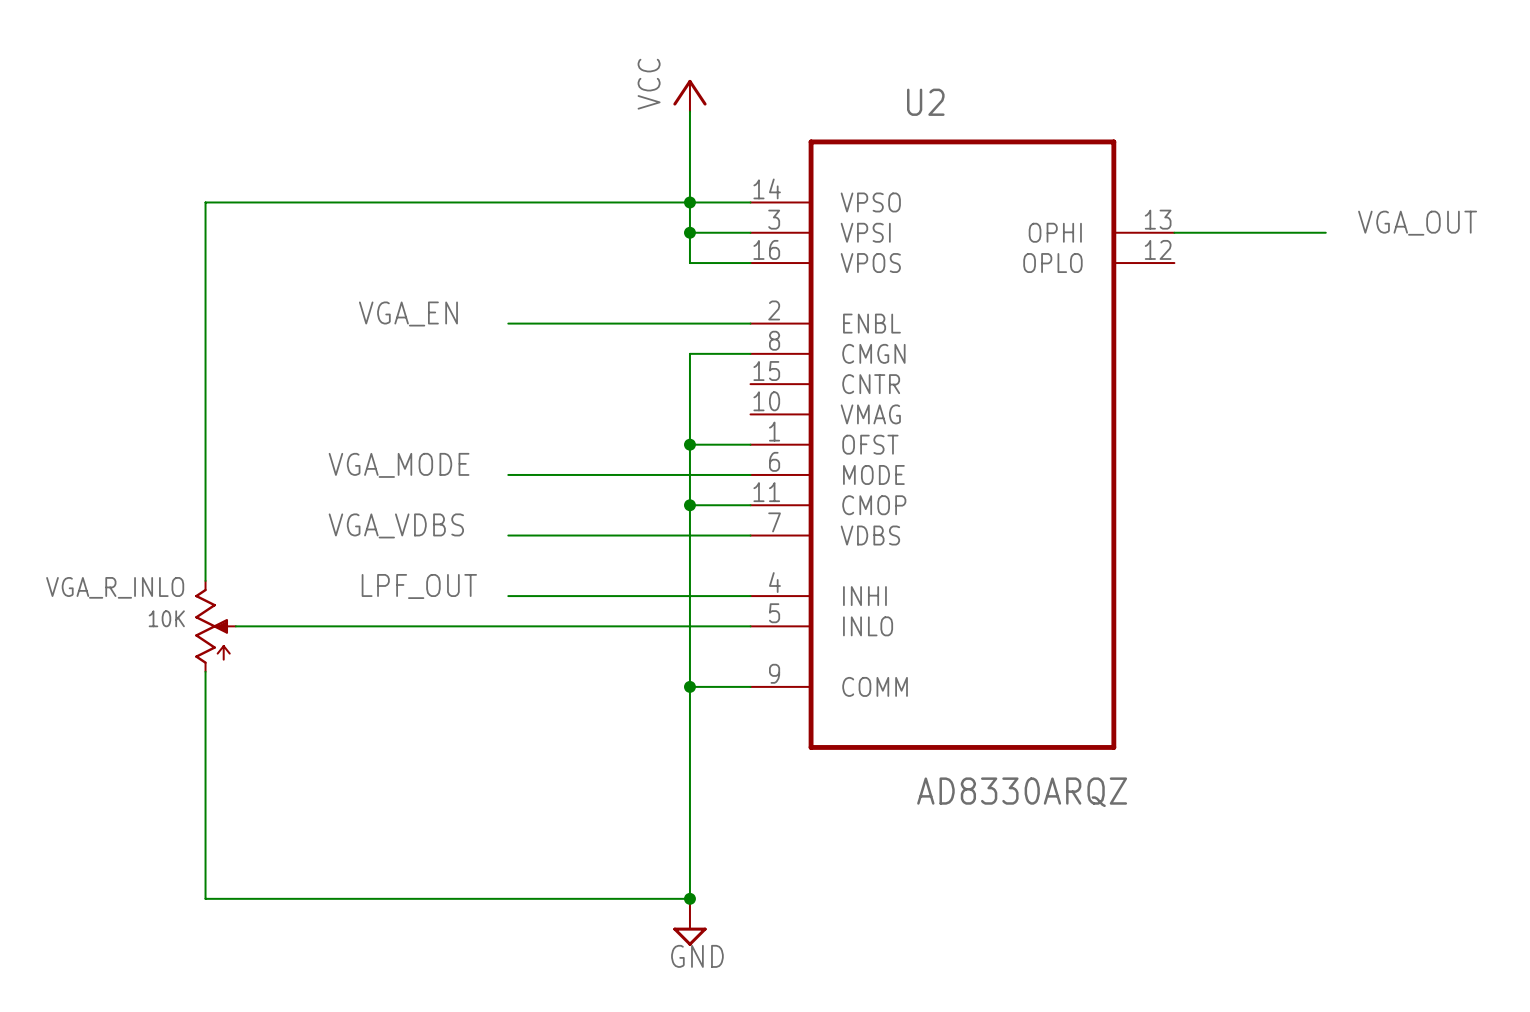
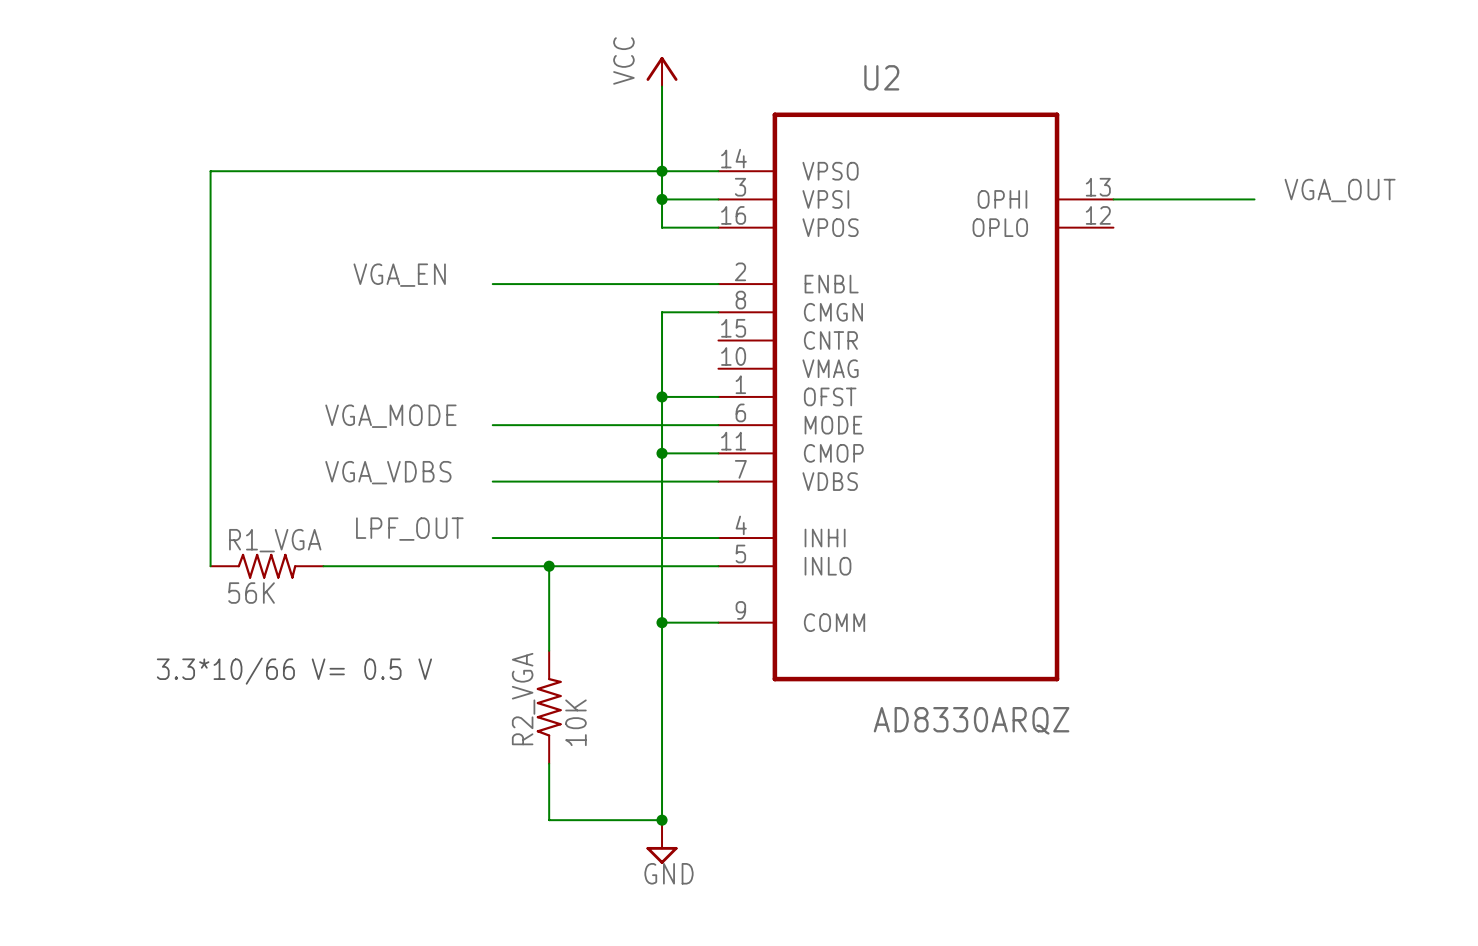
wire: none -> (210, 523) (210, 566)
VGA_R_INLO: 10K (215, 626) -> none
R1_VGA: none -> 56K (267, 566)
wire: none -> (549, 566) (549, 650)
junction: none -> (549, 566)
wire: (205, 671) (205, 898) (568, 898) -> (549, 763) (549, 820)
text: none -> 3.3*10/66 V= 0.5 V (294, 671)
R2_VGA: none -> 10K (549, 707)

